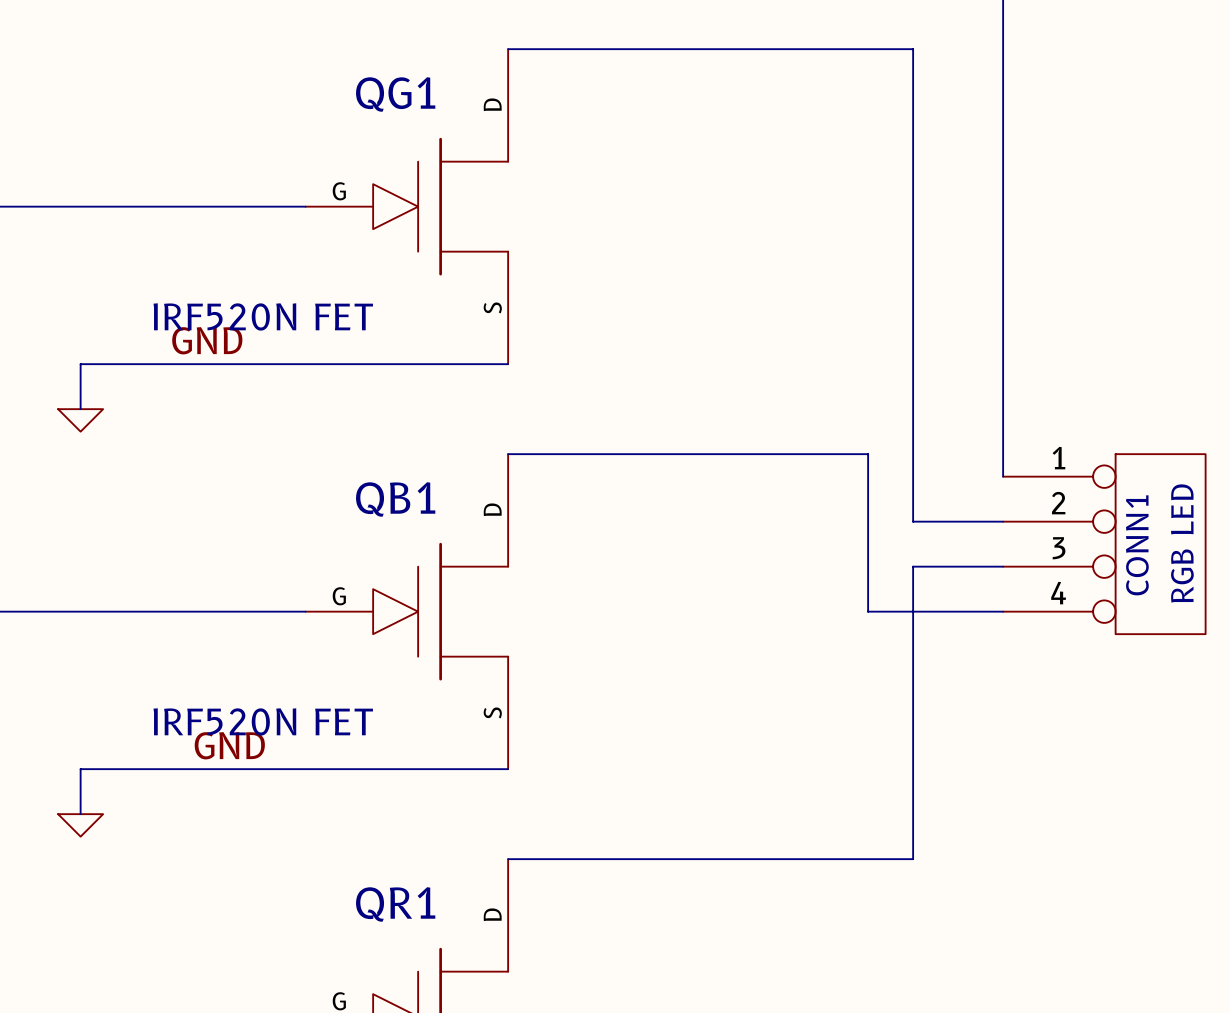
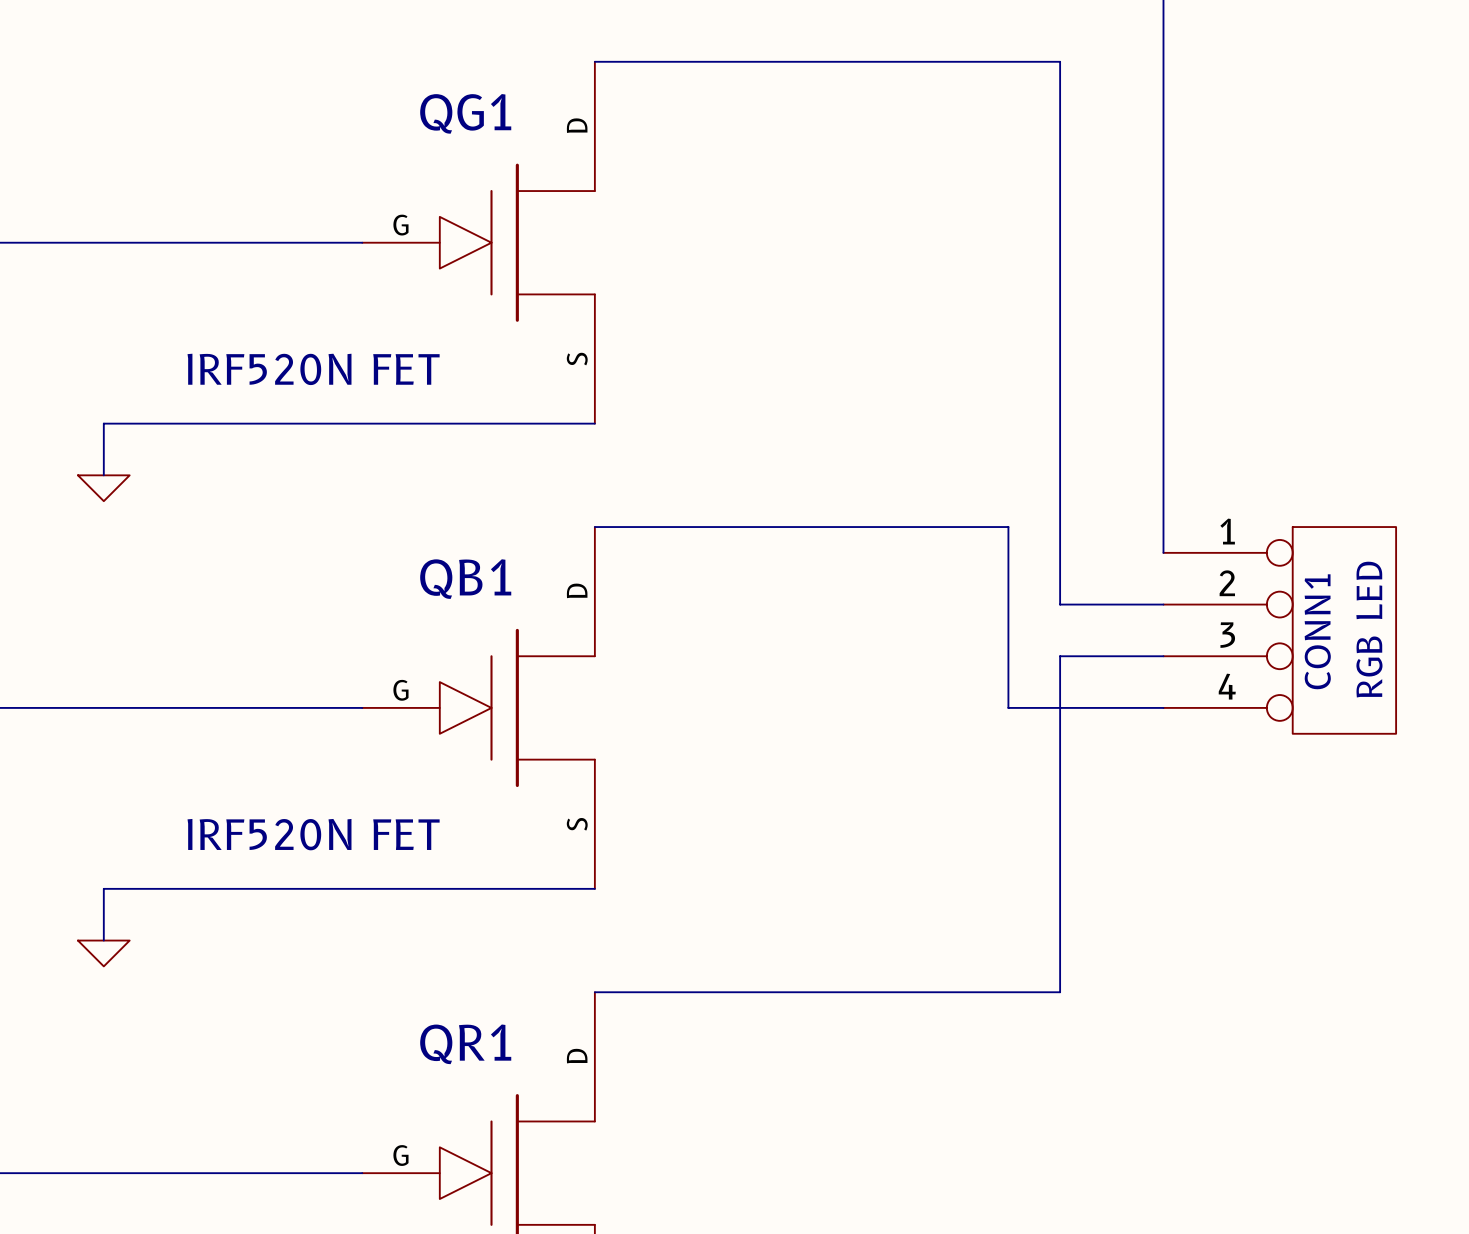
label: GND (207, 340) -> none
label: GND (229, 745) -> none

